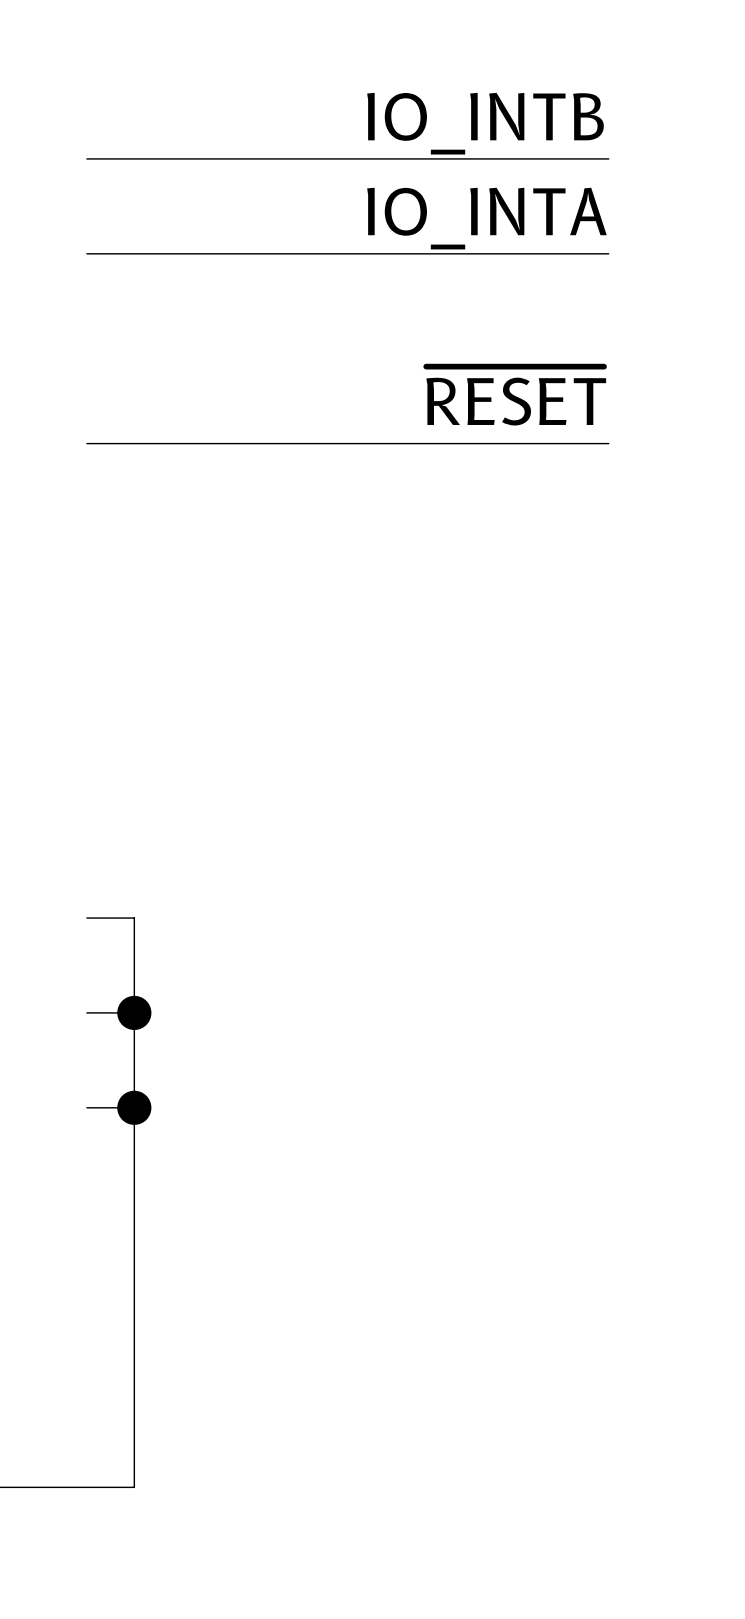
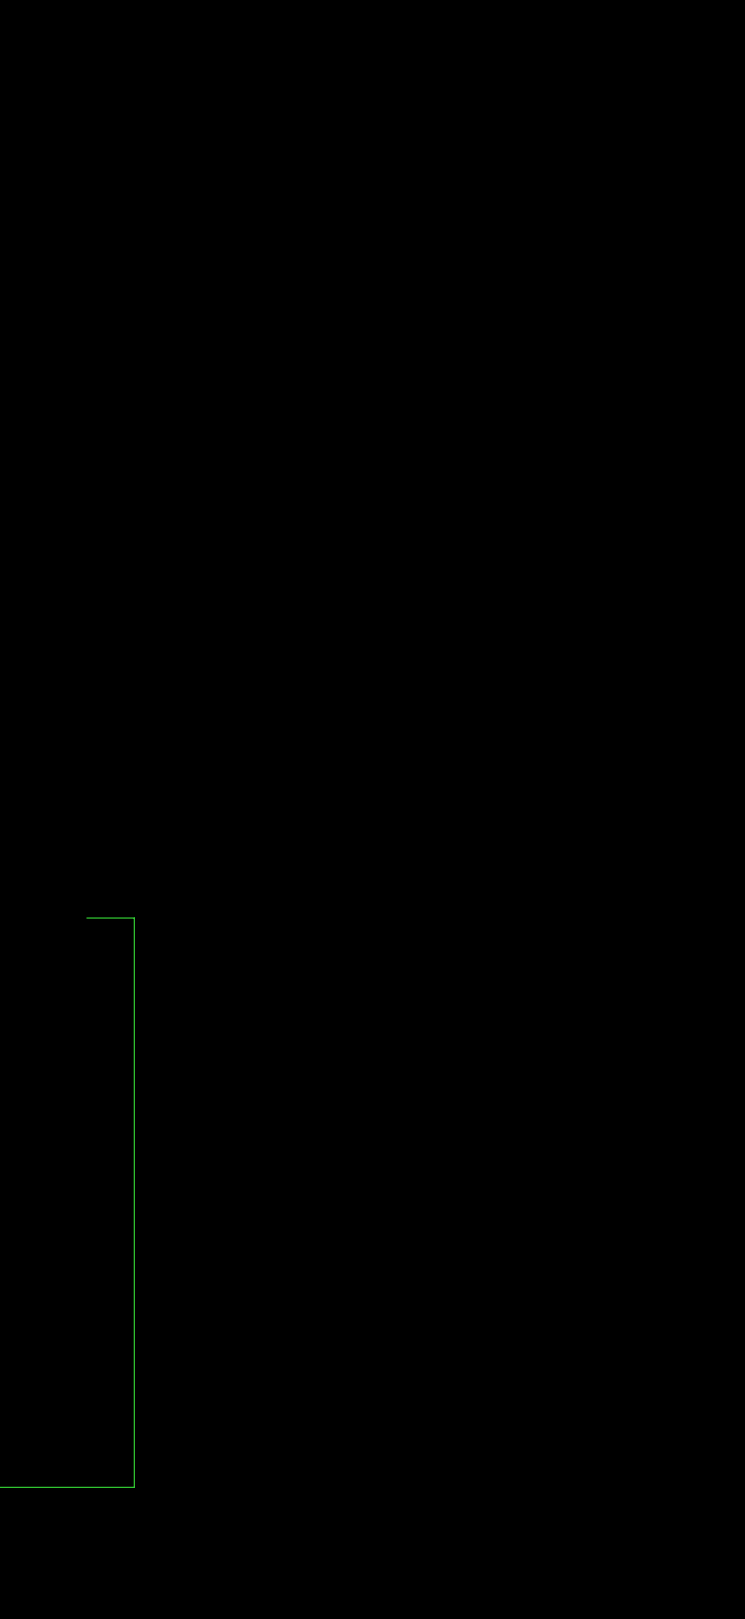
label: IO_INTB (485, 123) -> none
wire: (86, 158) (608, 158) -> none
label: IO_INTA (486, 218) -> none
wire: (86, 253) (608, 253) -> none
label: ~{RESET} (516, 396) -> none
wire: (86, 443) (608, 443) -> none
wire: (86, 1012) (134, 1012) -> none
junction: (134, 1012) -> none
wire: (86, 1107) (134, 1107) -> none
junction: (134, 1107) -> none

